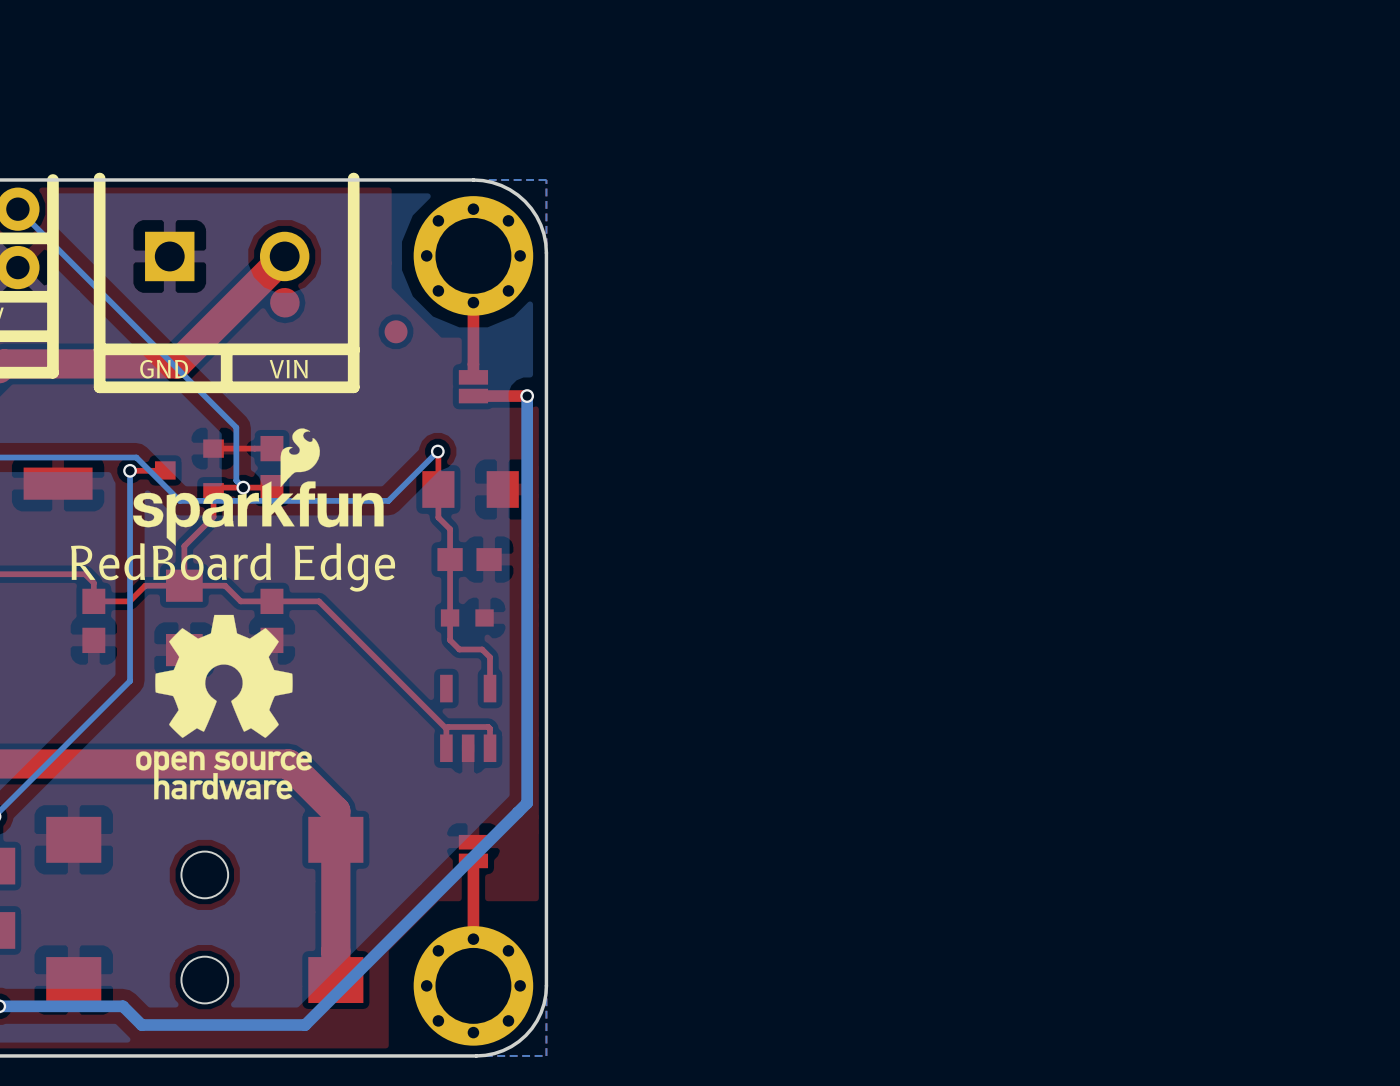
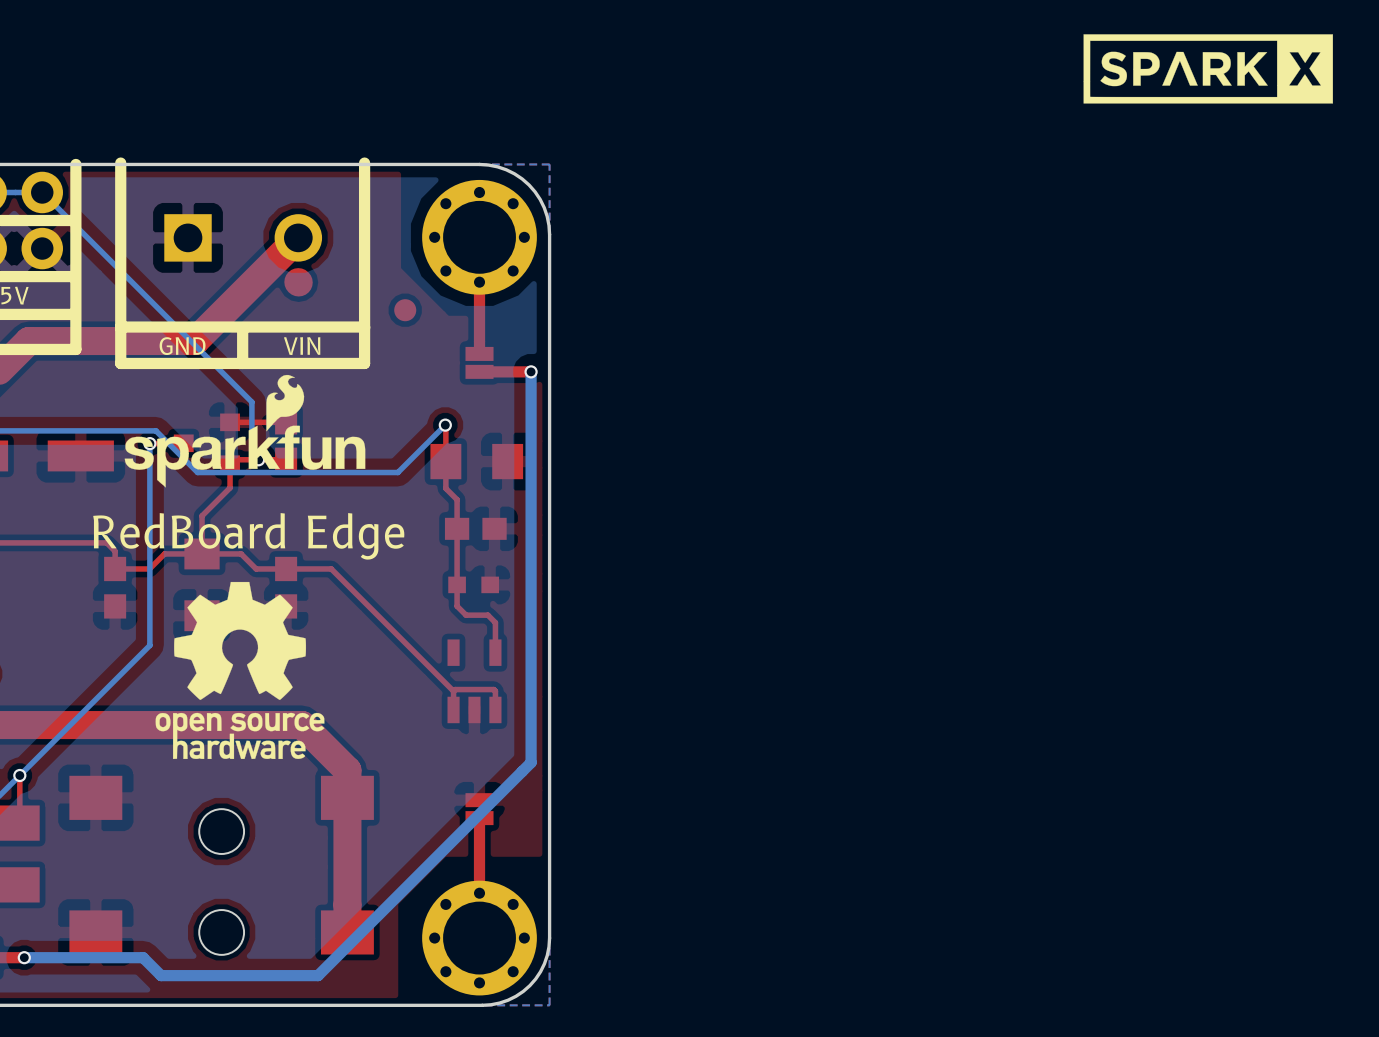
drawing: none -> [1083, 34, 1333, 104]
drawing position: (258, 487) -> (244, 431)

